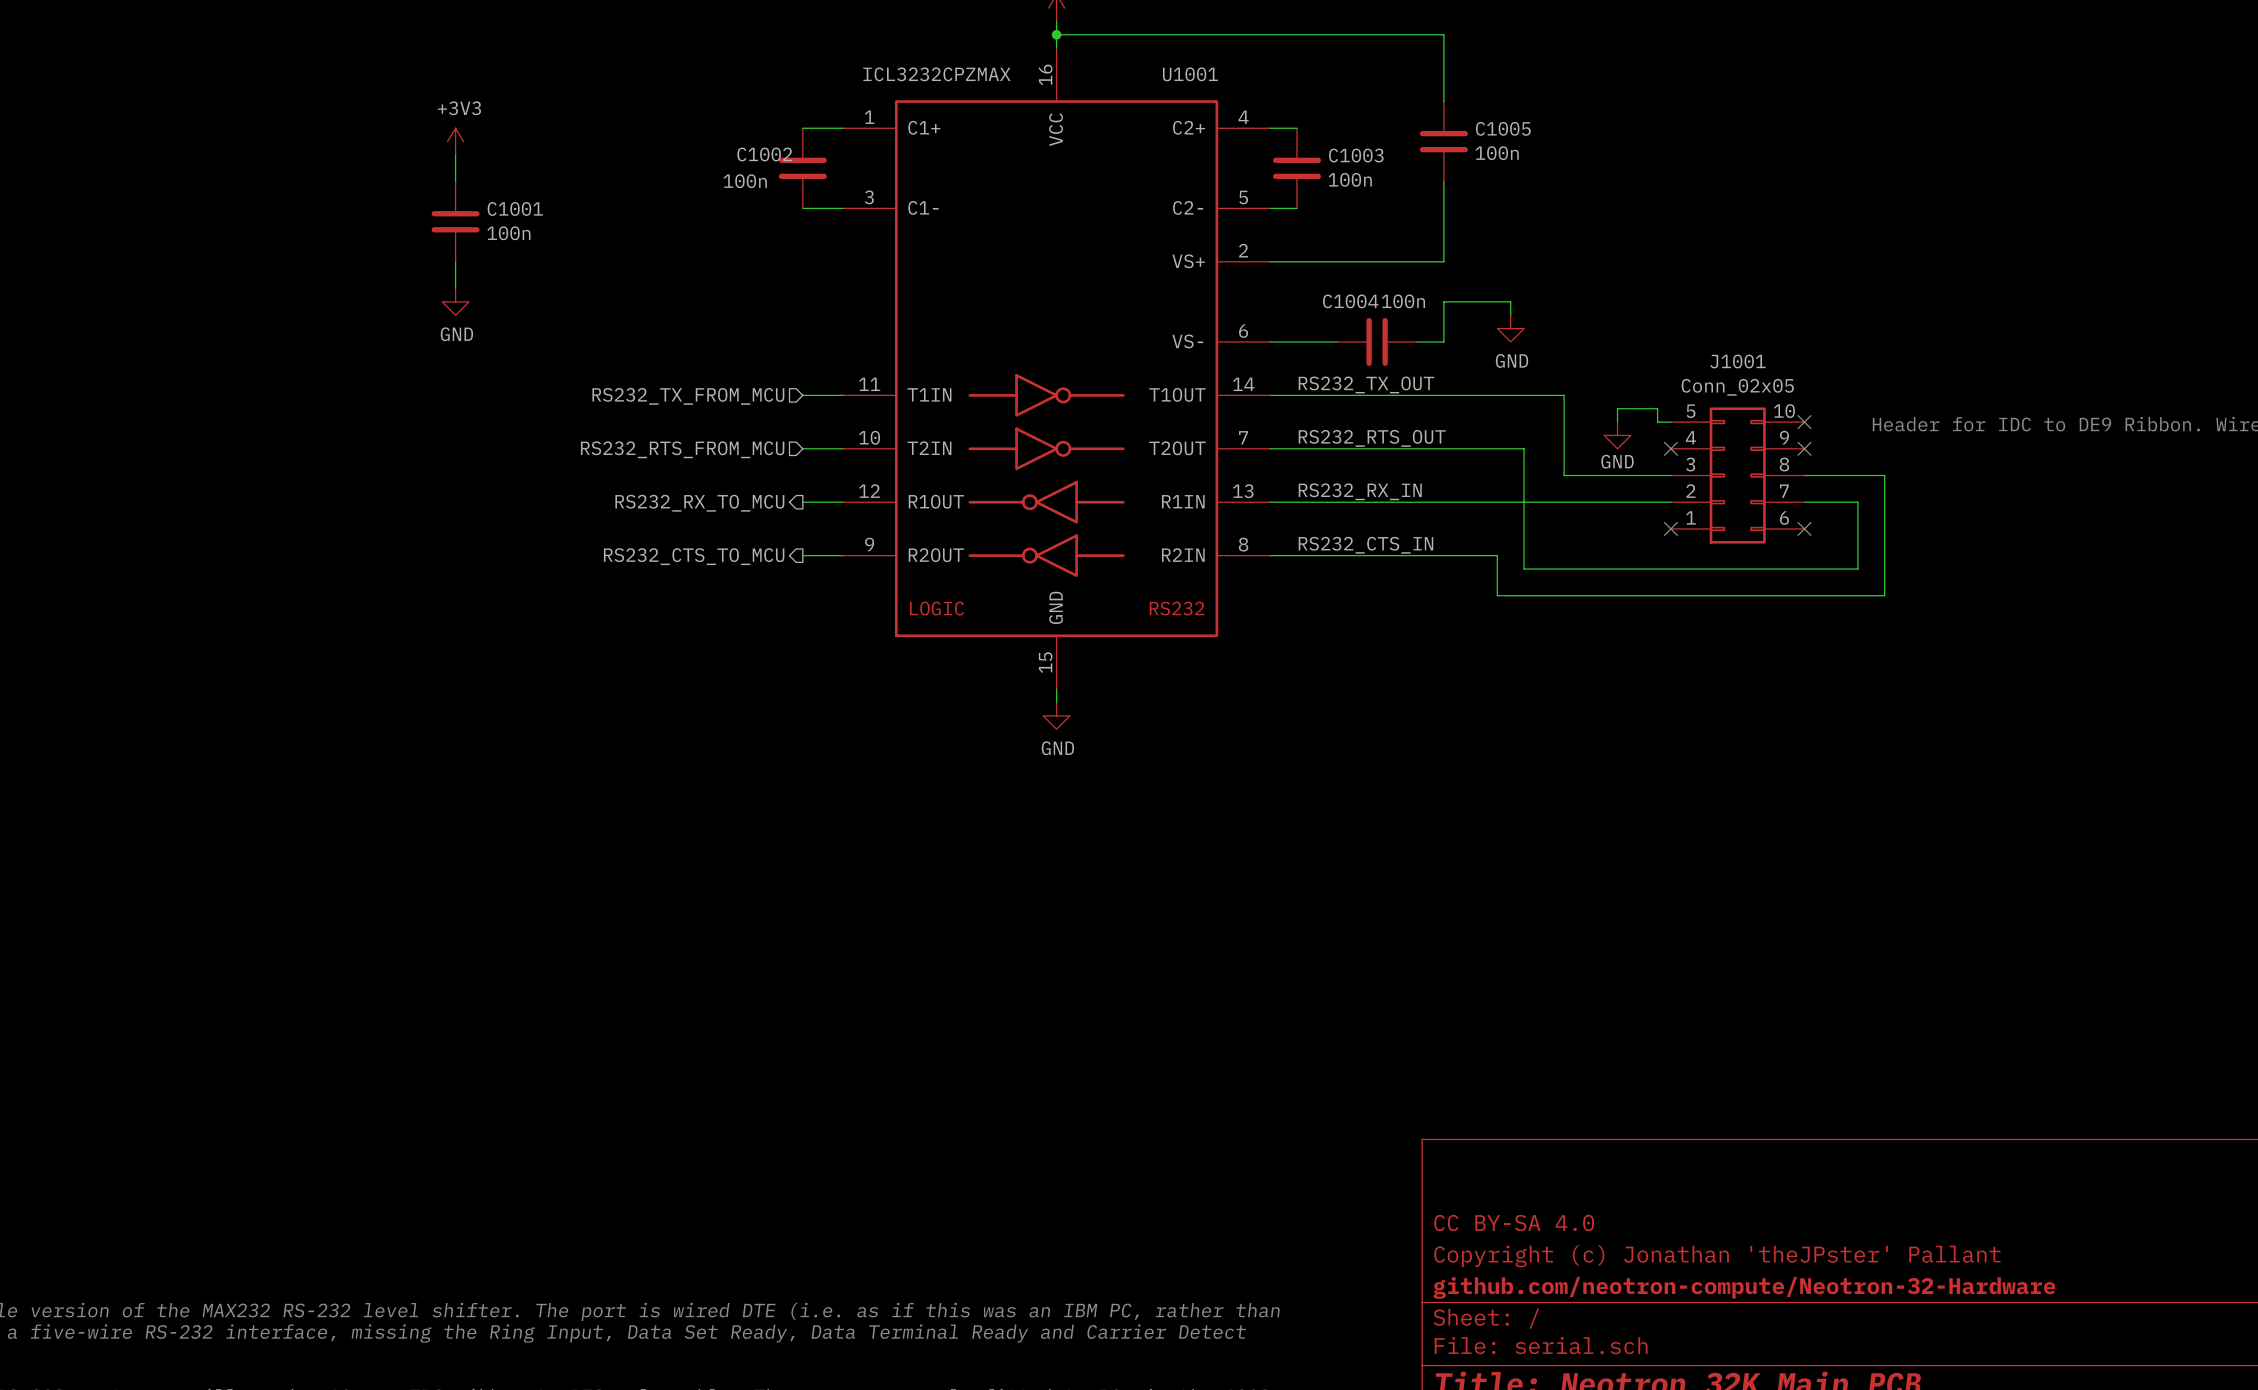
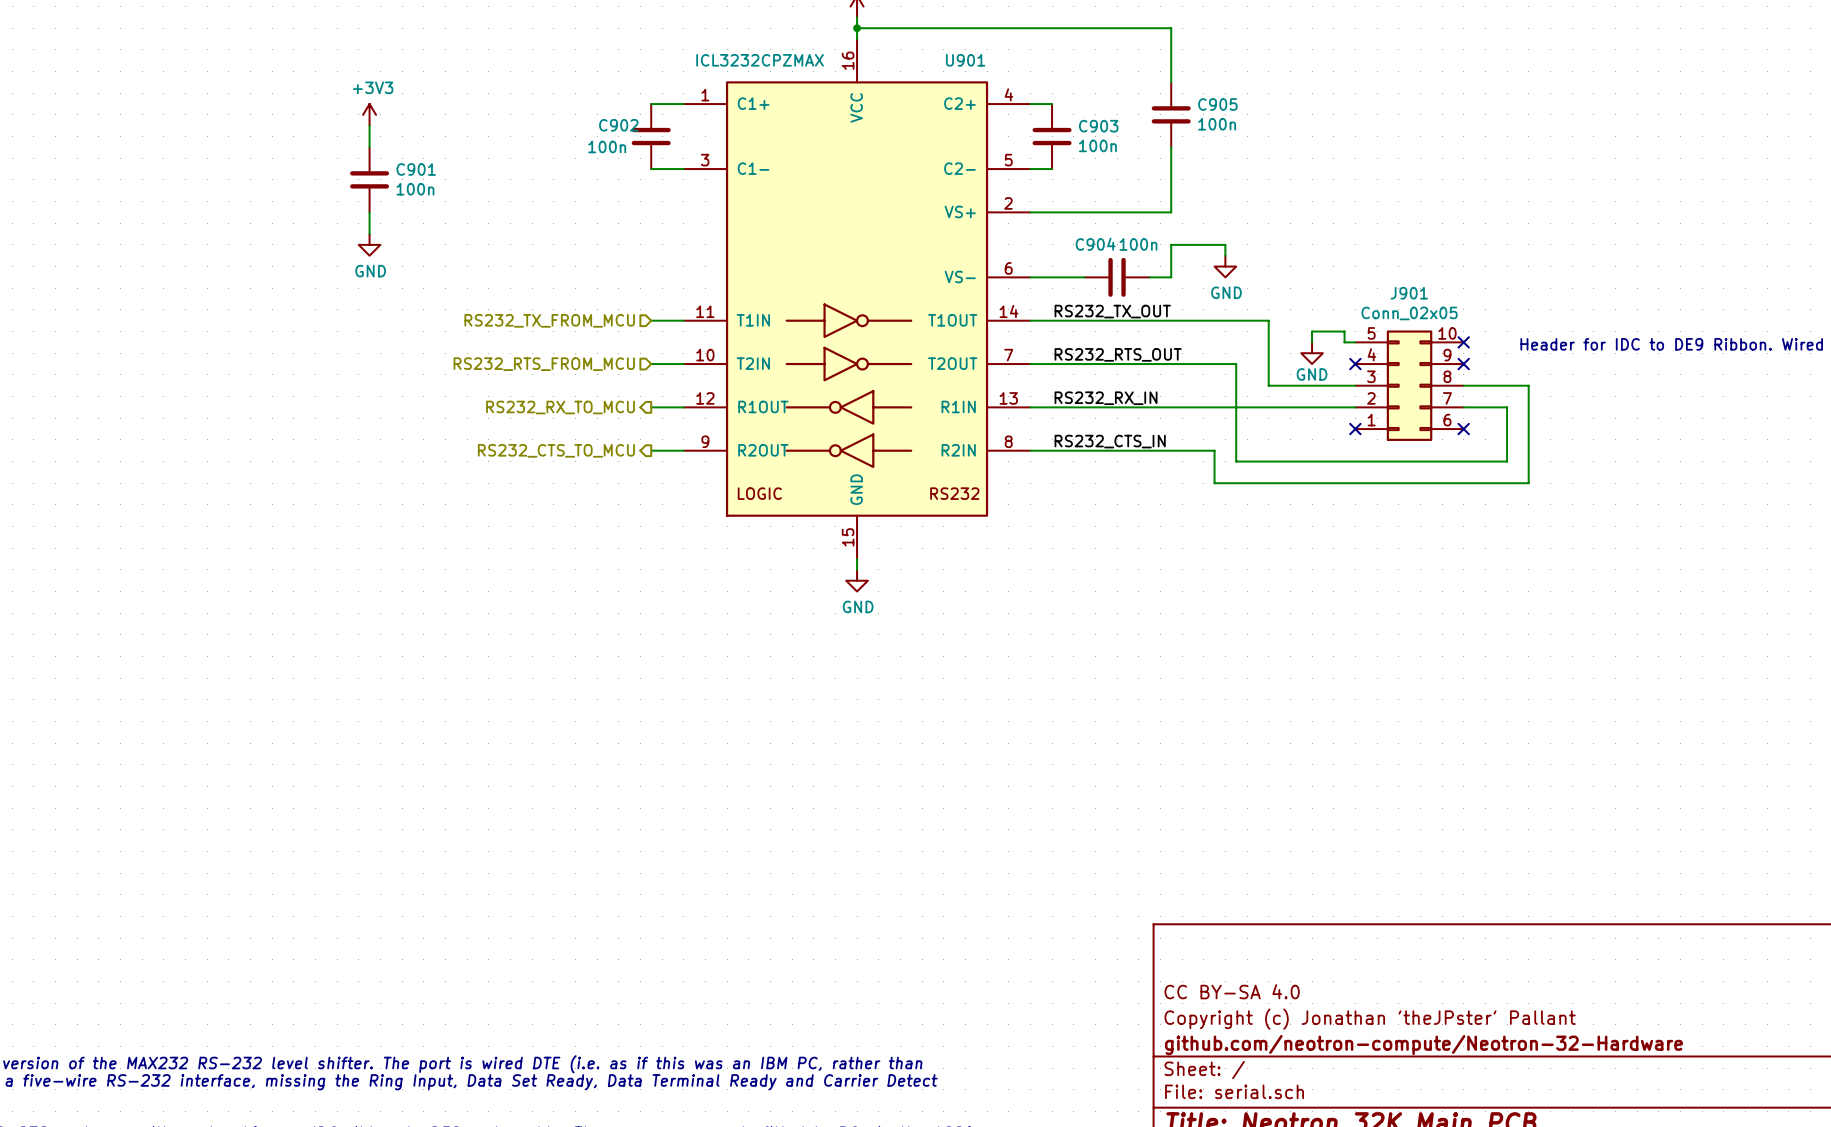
U1001 name: U1001 (1190, 74) -> U901 (965, 60)
C1005 name: C1005 (1503, 128) -> C905 (1217, 104)
C1002 name: C1002 (764, 154) -> C902 (618, 125)
C1003 name: C1003 (1356, 155) -> C903 (1098, 126)
C1001 name: C1001 (515, 208) -> C901 (416, 169)
C1004 name: C1004 (1350, 301) -> C904 (1095, 244)
J1001 name: J1001 (1737, 361) -> J901 (1409, 293)

